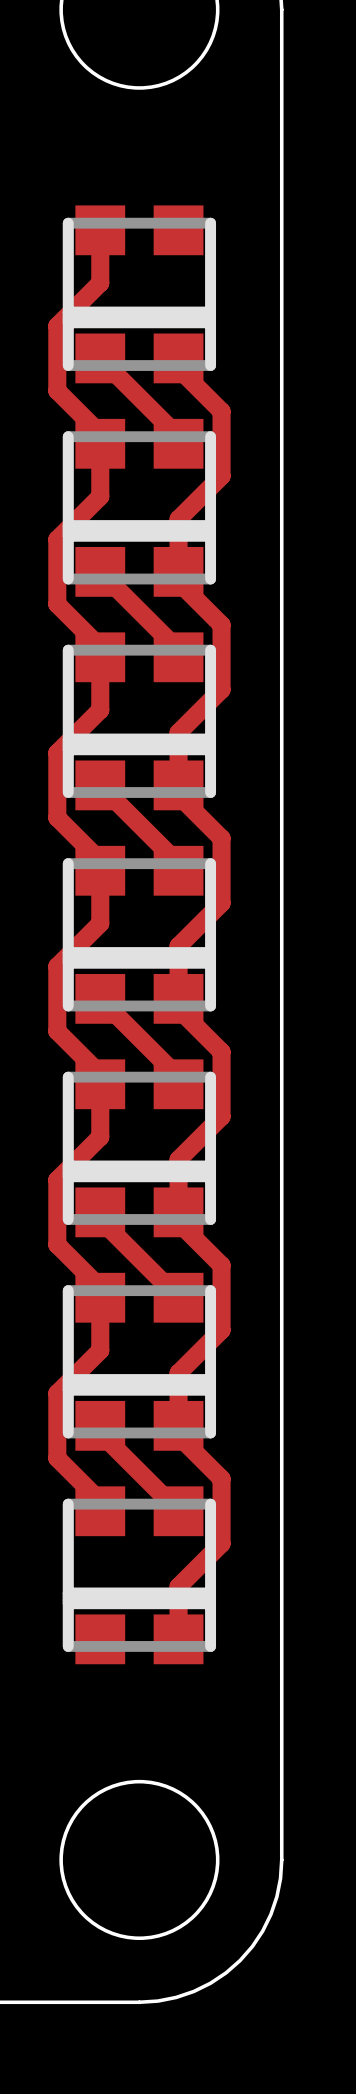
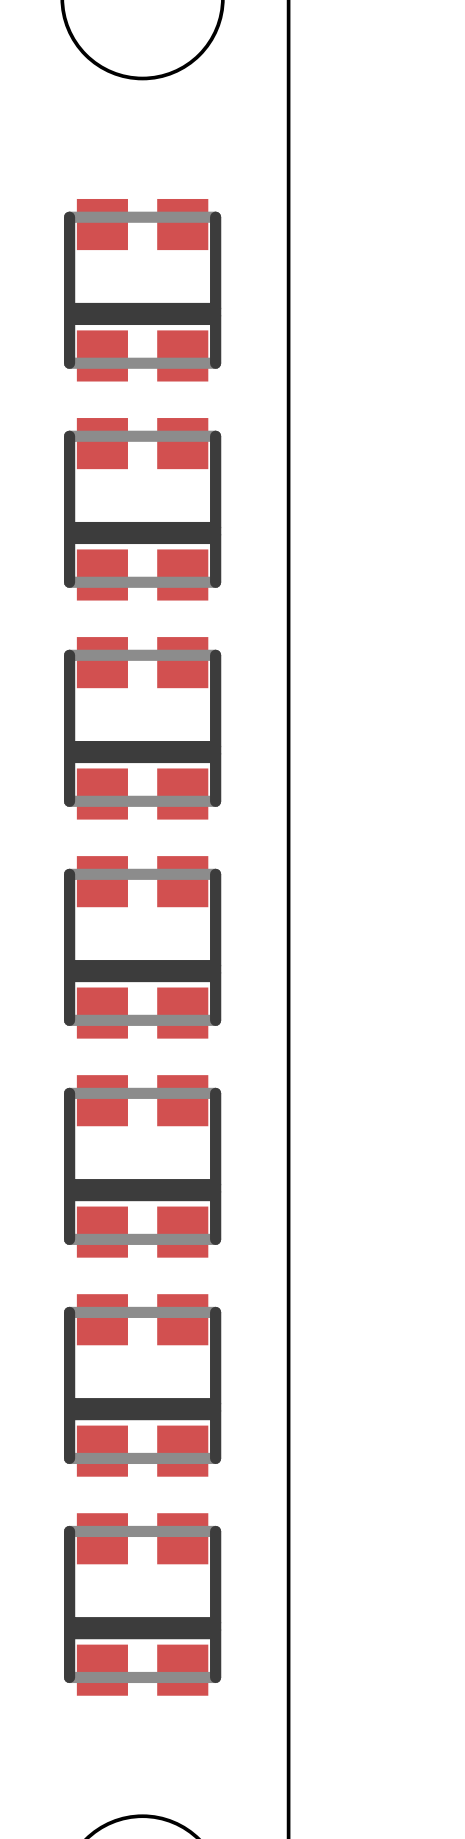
top track: (100, 230) (100, 283) (57, 326) (57, 390) (100, 433) (100, 496) (57, 539) (57, 604) (100, 647) (100, 710) (57, 752) (57, 817) (100, 860) (100, 923) (57, 966) (57, 1031) (100, 1074) (100, 1136) (57, 1179) (57, 1244) (100, 1287) (100, 1350) (57, 1393) (57, 1458) (100, 1501) (100, 1511) -> none
top track: (100, 358) (178, 436) (178, 443) -> none
top track: (178, 358) (178, 368) (221, 411) (221, 476) (178, 519) (178, 581) (221, 624) (221, 689) (178, 732) (178, 795) (221, 838) (221, 903) (178, 946) (178, 1008) (221, 1051) (221, 1116) (178, 1159) (178, 1222) (221, 1265) (221, 1330) (178, 1373) (178, 1435) (221, 1478) (221, 1543) (178, 1586) (178, 1639) -> none
top track: (100, 571) (178, 650) (178, 657) -> none
top track: (100, 785) (178, 863) (178, 870) -> none
top track: (100, 998) (178, 1077) (178, 1084) -> none
top track: (100, 1212) (100, 1219) (178, 1297) -> none
top track: (100, 1425) (100, 1432) (178, 1511) -> none

